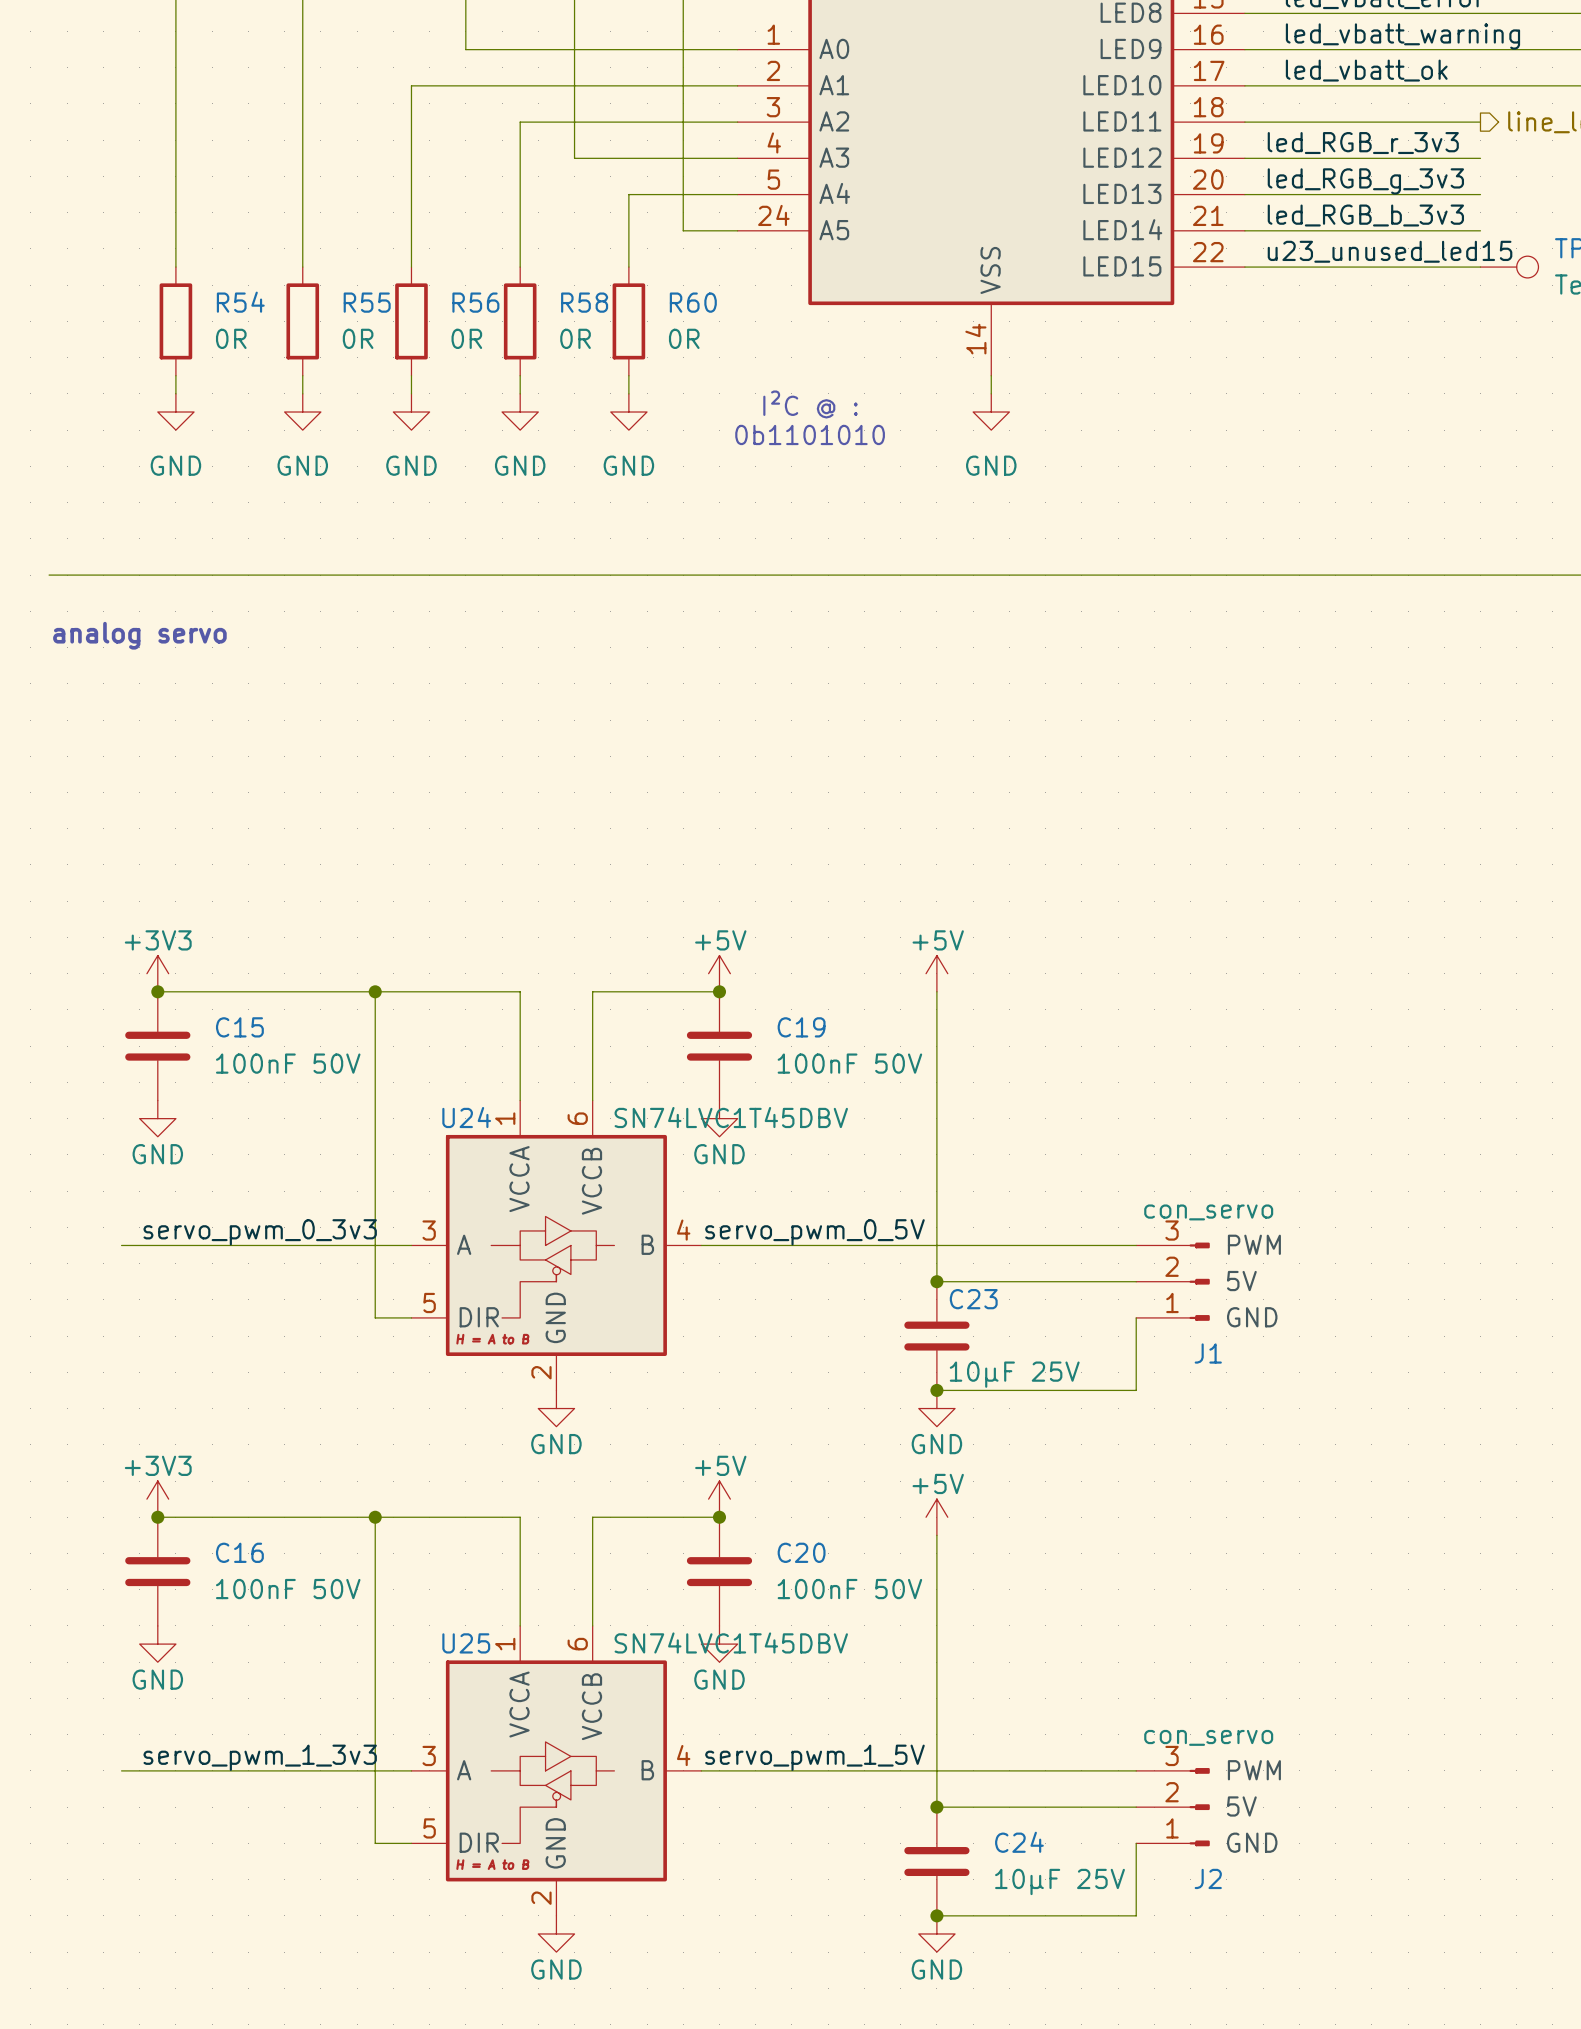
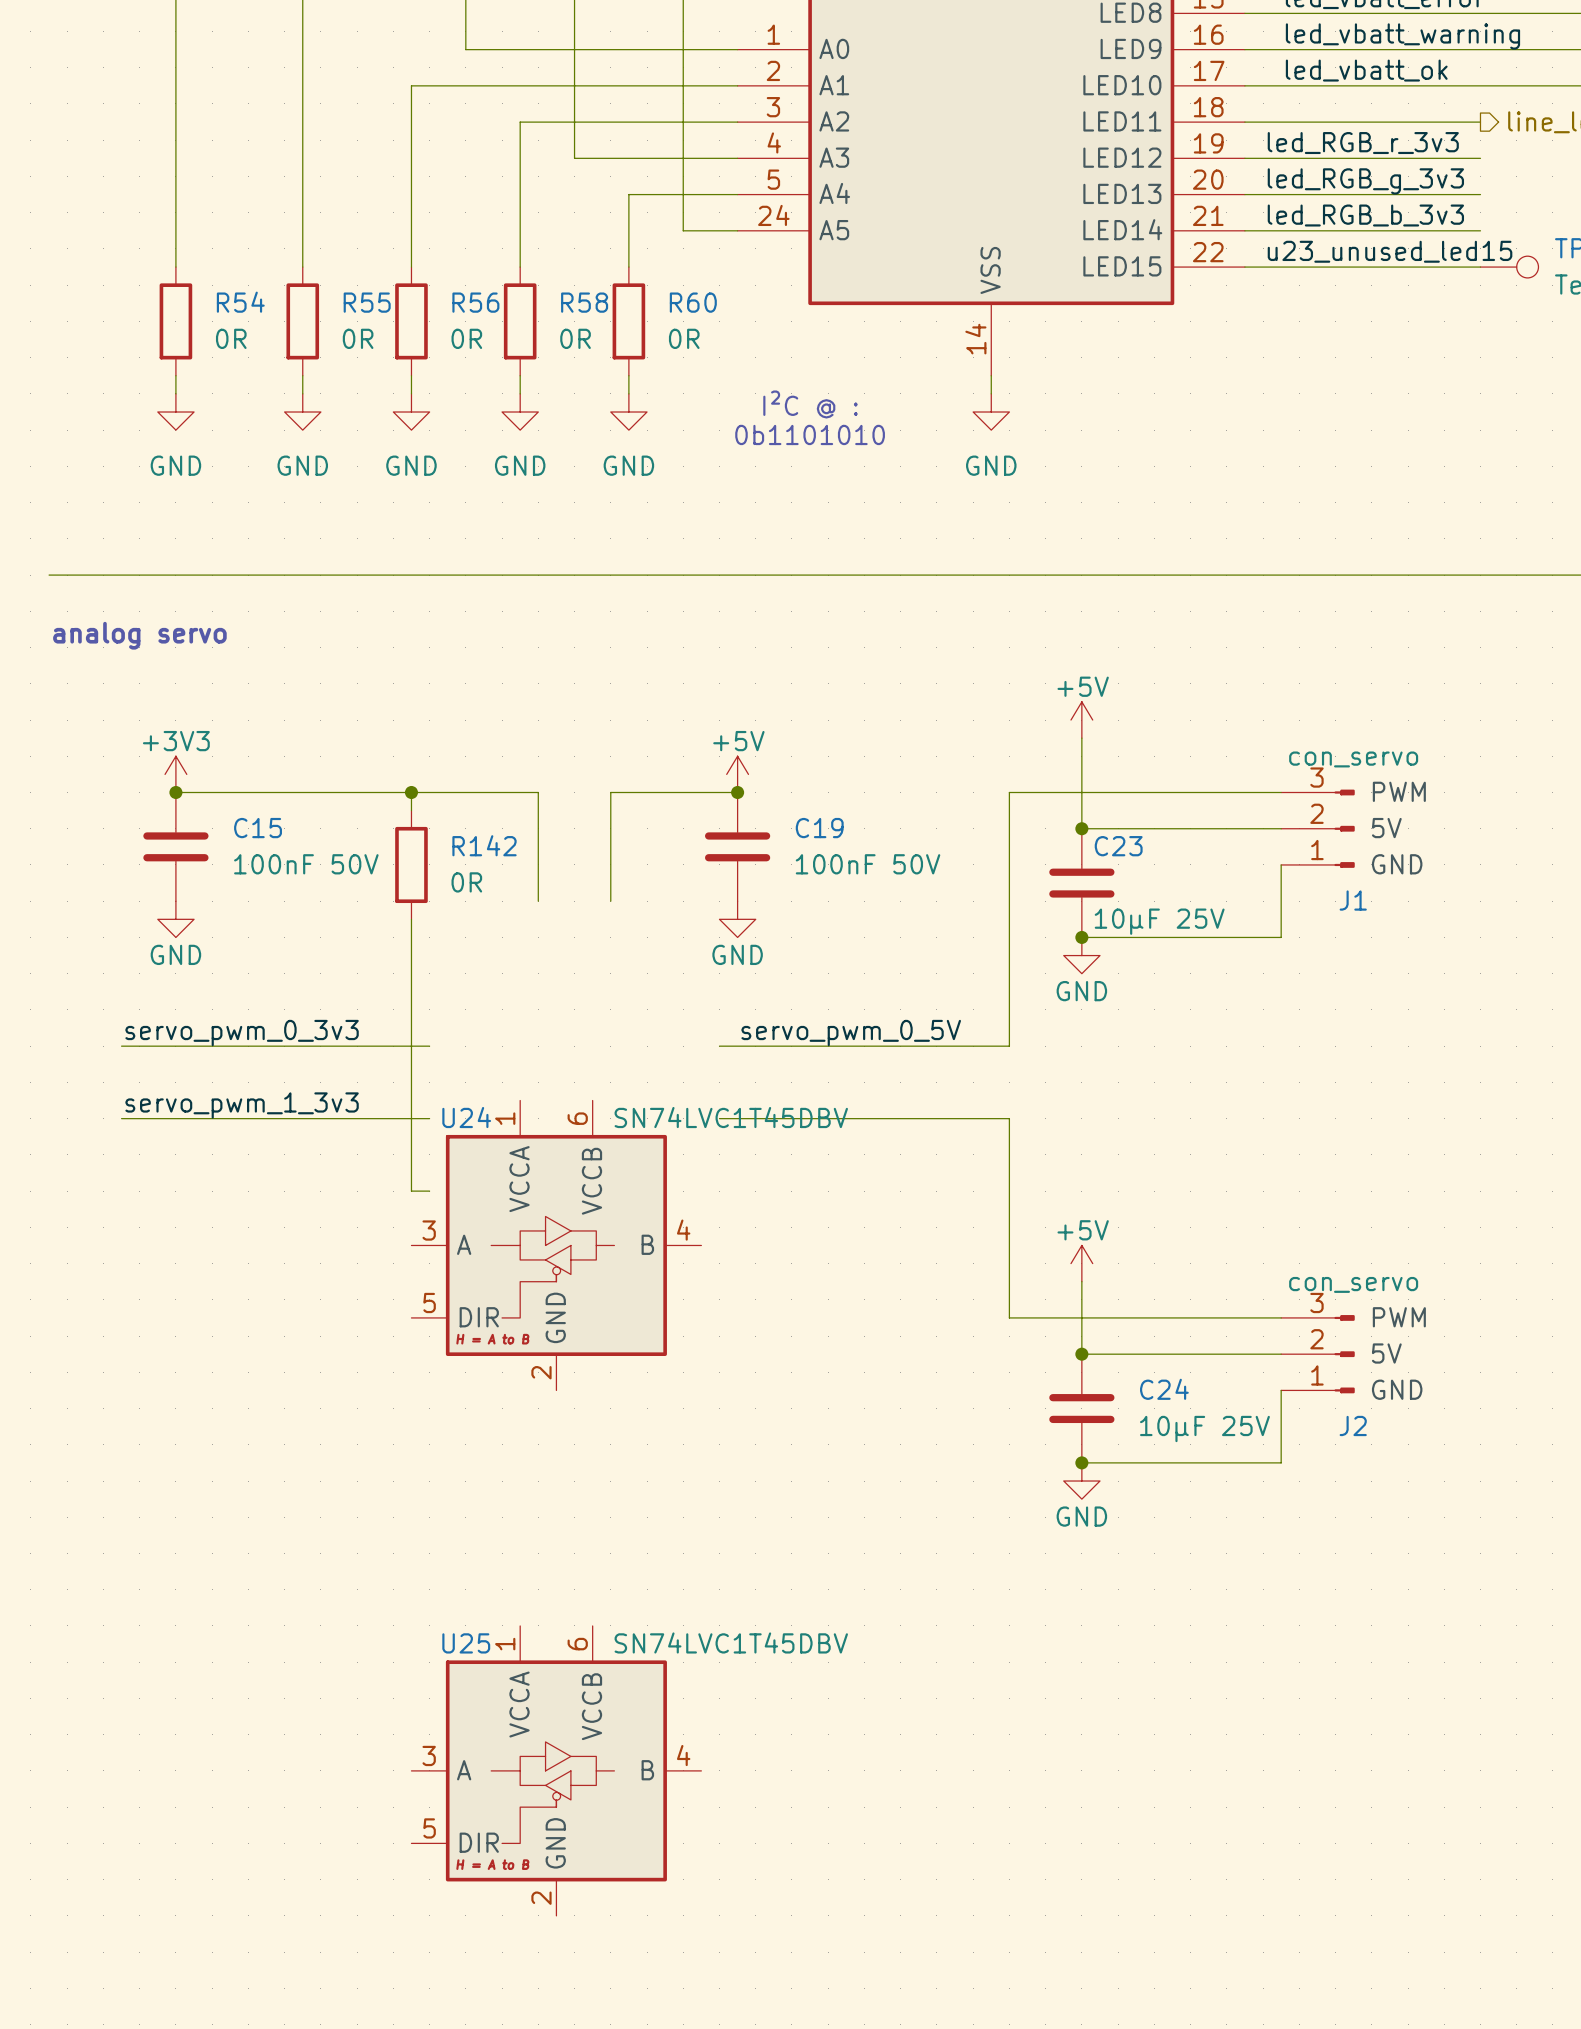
power symbol: none -> +5V (1081, 720)
wire: none -> (1081, 738) (1081, 828) (1281, 828)
power symbol: none -> +5V (737, 774)
junction: none -> (175, 792)
wire: none -> (411, 792) (411, 810)
junction: none -> (411, 792)
junction: none -> (737, 792)
wire: none -> (1281, 792) (1009, 792) (1009, 1046) (719, 1046)
junction: none -> (1081, 828)
R142: none -> 0R (411, 864)
wire: none -> (1281, 864) (1281, 937) (1081, 937)
wire: none -> (411, 919) (411, 1191) (429, 1191)
power symbol: none -> GND (737, 919)
junction: none -> (1081, 937)
power symbol: none -> GND (1081, 955)
power symbol position: +3V3 (157, 973) -> +3V3 (175, 774)
power symbol: +5V (719, 973) -> none
power symbol: +5V (936, 973) -> none
wire: (157, 991) (520, 991) (520, 1100) -> (175, 792) (538, 792) (538, 901)
junction: (157, 991) -> none
wire: (375, 991) (375, 1317) (411, 1317) -> none
junction: (375, 991) -> none
wire: (719, 991) (592, 991) (592, 1100) -> (737, 792) (610, 792) (610, 901)
junction: (719, 991) -> none
wire: (936, 991) (936, 1281) (1136, 1281) -> none
wire: none -> (121, 1046) (429, 1046)
C15 position: (157, 1046) -> (175, 846)
C19 position: (719, 1046) -> (737, 846)
label: none -> servo_pwm_1_3v3 (242, 1105)
wire: none -> (121, 1118) (429, 1118)
power symbol position: GND (157, 1118) -> GND (175, 919)
wire: none -> (719, 1118) (1009, 1118) (1009, 1317) (1281, 1317)
power symbol: GND (719, 1118) -> none
label position: servo_pwm_0_3v3 (260, 1232) -> servo_pwm_0_3v3 (242, 1033)
label position: servo_pwm_0_5V (814, 1232) -> servo_pwm_0_5V (851, 1033)
wire: (121, 1245) (411, 1245) -> none
wire: (701, 1245) (1136, 1245) -> none
power symbol: none -> +5V (1081, 1263)
junction: (936, 1281) -> none
wire: none -> (1081, 1281) (1081, 1354) (1281, 1354)
J1 position: (1173, 1281) -> (1317, 828)
wire: (1136, 1317) (1136, 1390) (936, 1390) -> (1281, 1390) (1281, 1462) (1081, 1462)
C23 position: (936, 1336) -> (1081, 883)
junction: none -> (1081, 1354)
junction: (936, 1390) -> none
power symbol: GND (556, 1408) -> none
power symbol position: GND (936, 1408) -> GND (1081, 1481)
junction: none -> (1081, 1462)
power symbol: +3V3 (157, 1499) -> none
power symbol: +5V (719, 1499) -> none
wire: (157, 1517) (520, 1517) (520, 1625) -> none
junction: (157, 1517) -> none
wire: (375, 1517) (375, 1843) (411, 1843) -> none
junction: (375, 1517) -> none
wire: (719, 1517) (592, 1517) (592, 1625) -> none
junction: (719, 1517) -> none
power symbol: +5V (936, 1517) -> none
wire: (936, 1535) (936, 1807) (1136, 1807) -> none
C16: 100nF 50V (157, 1571) -> none
C20: 100nF 50V (719, 1571) -> none
power symbol: GND (157, 1644) -> none
power symbol: GND (719, 1644) -> none
label: servo_pwm_1_3v3 (260, 1757) -> none
label: servo_pwm_1_5V (814, 1757) -> none
wire: (121, 1770) (411, 1770) -> none
wire: (701, 1770) (1136, 1770) -> none
junction: (936, 1807) -> none
J2 position: (1173, 1807) -> (1317, 1354)
wire: (1136, 1843) (1136, 1915) (936, 1915) -> none
C24 position: (936, 1861) -> (1081, 1408)
junction: (936, 1915) -> none
power symbol: GND (556, 1933) -> none
power symbol: GND (936, 1933) -> none

